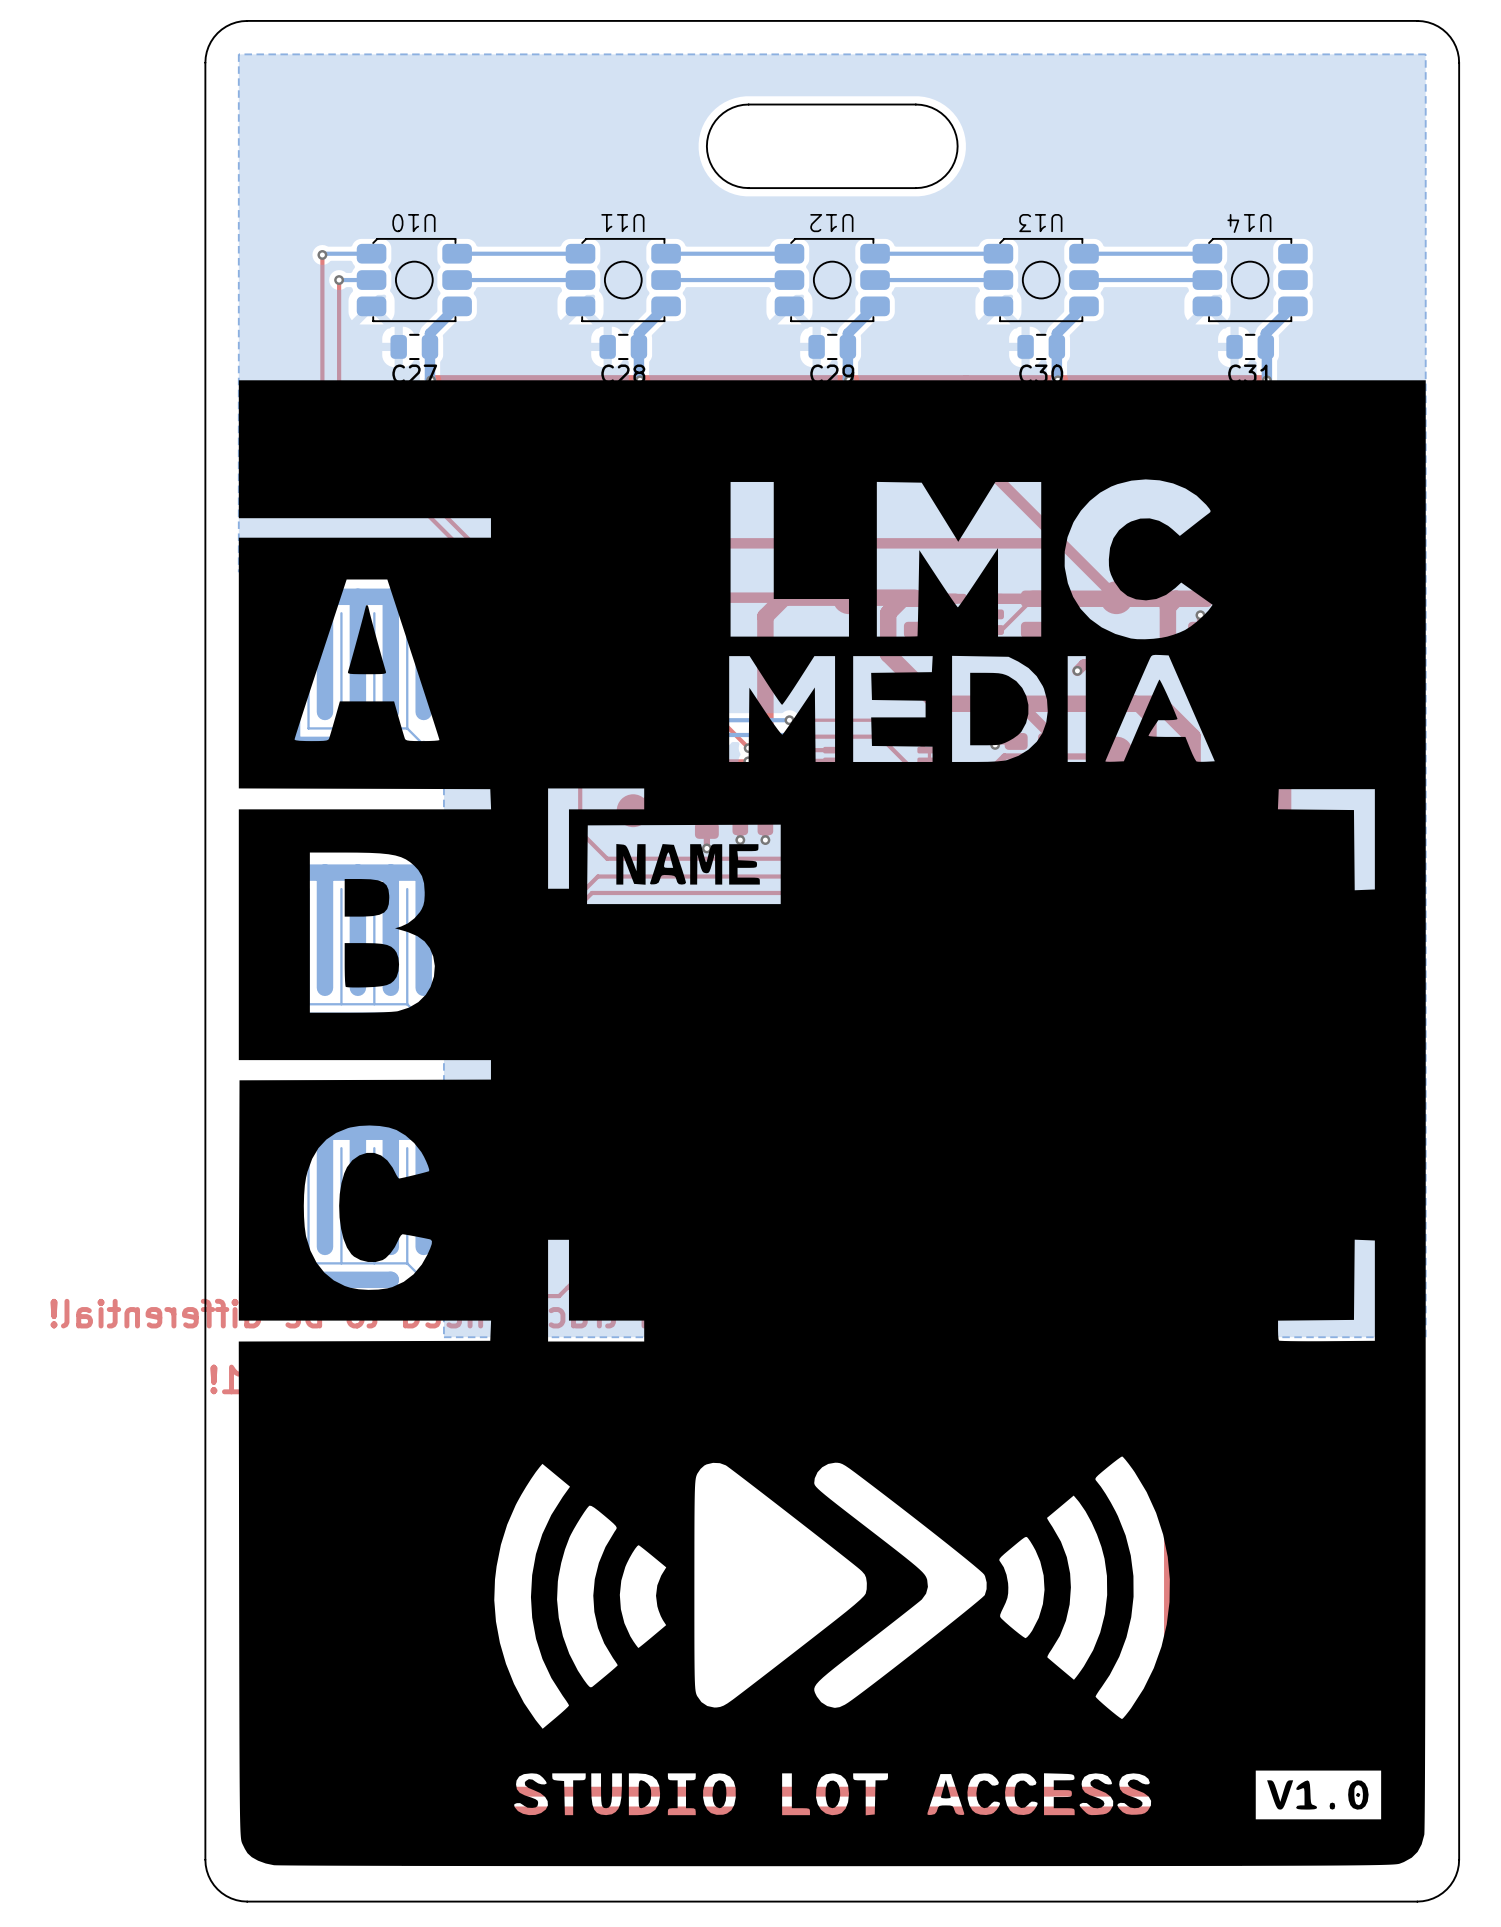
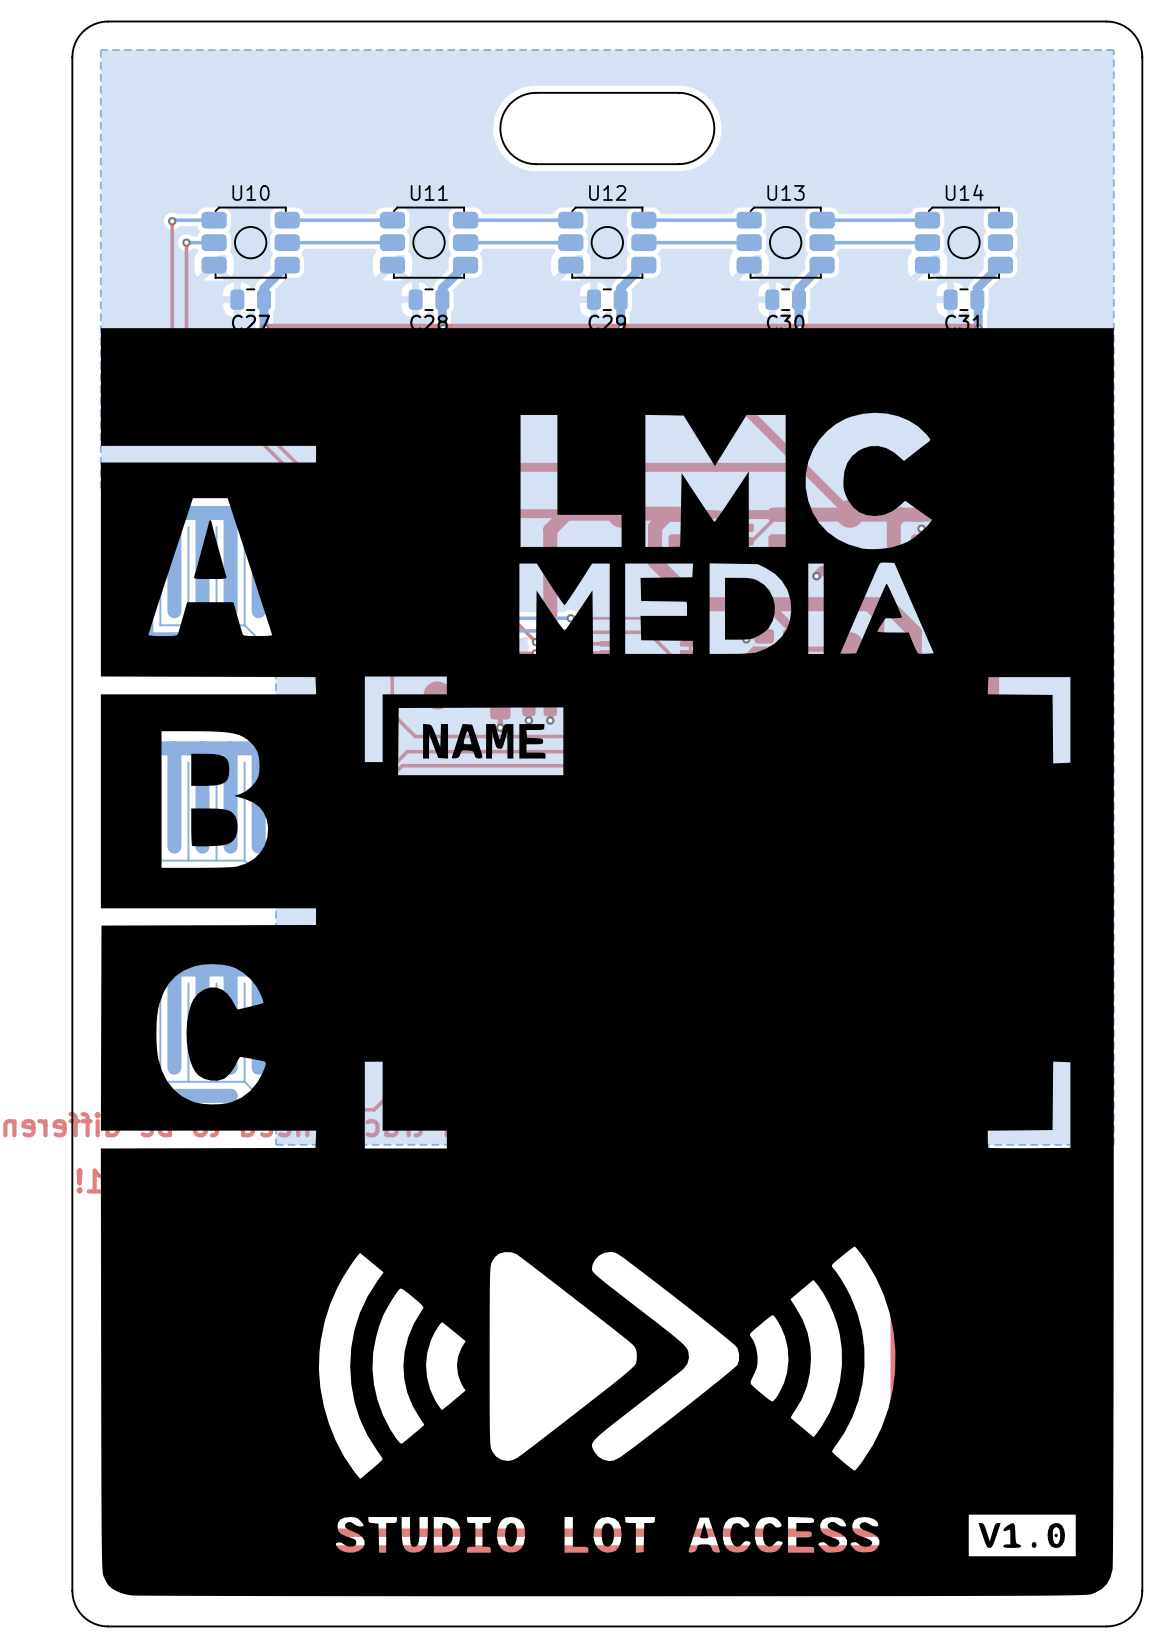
U10 name rotation: 0° (413, 223) -> 180° (251, 192)
U11 name rotation: 0° (622, 223) -> 180° (429, 192)
U12 name rotation: 0° (831, 223) -> 180° (607, 192)
U13 name rotation: 0° (1040, 223) -> 180° (785, 192)
U14 name rotation: 0° (1249, 223) -> 180° (964, 192)

